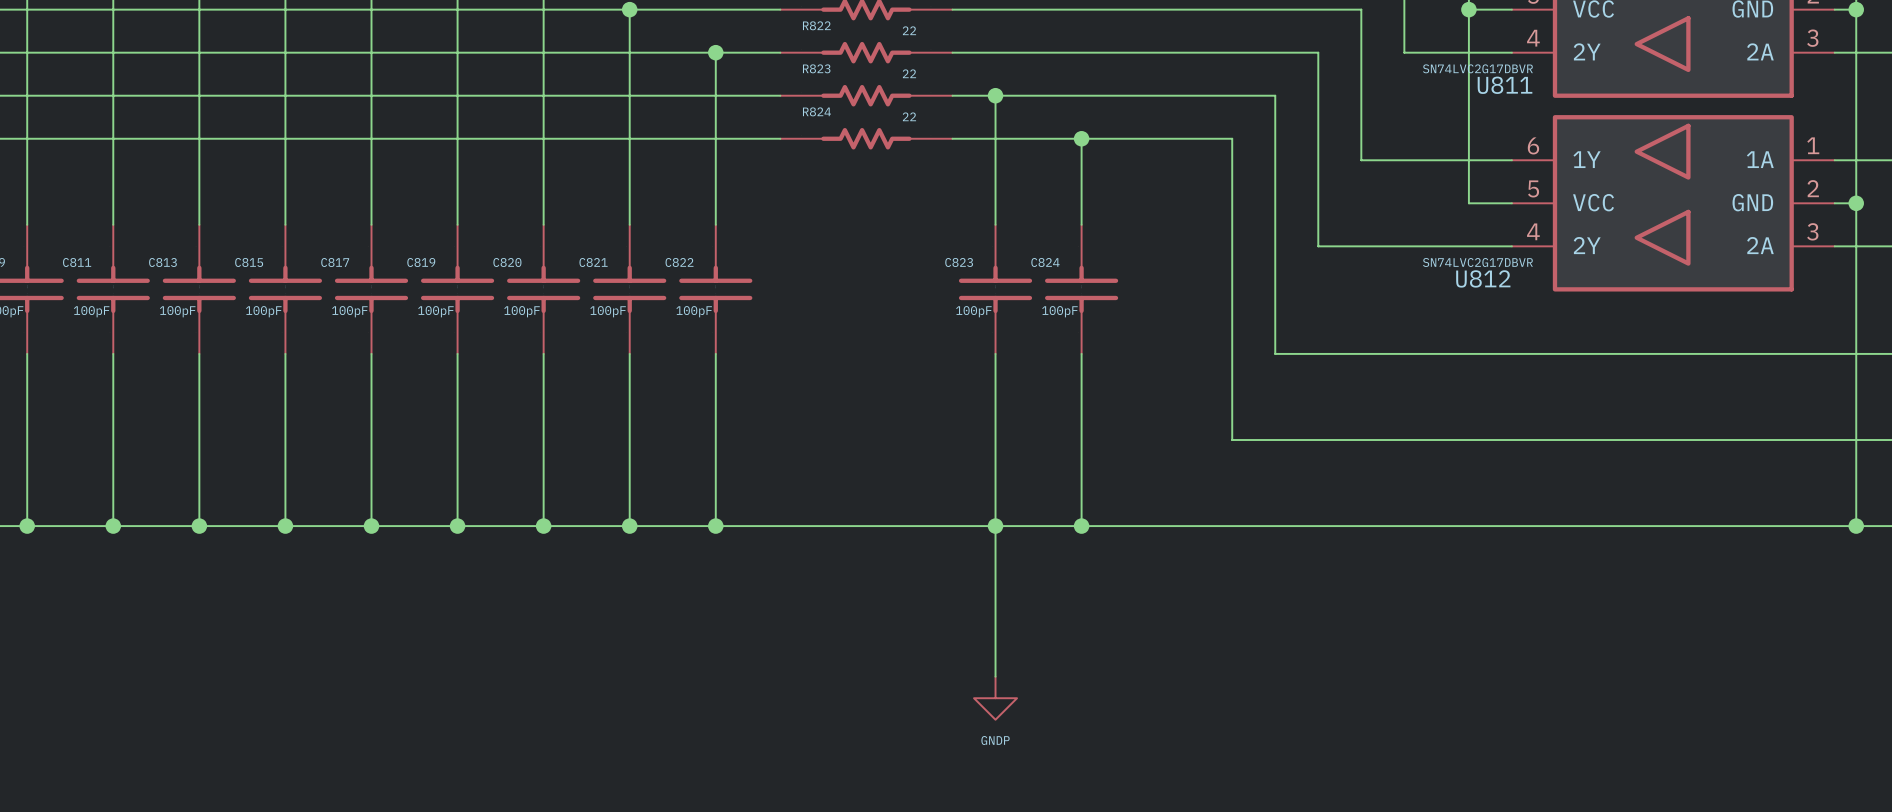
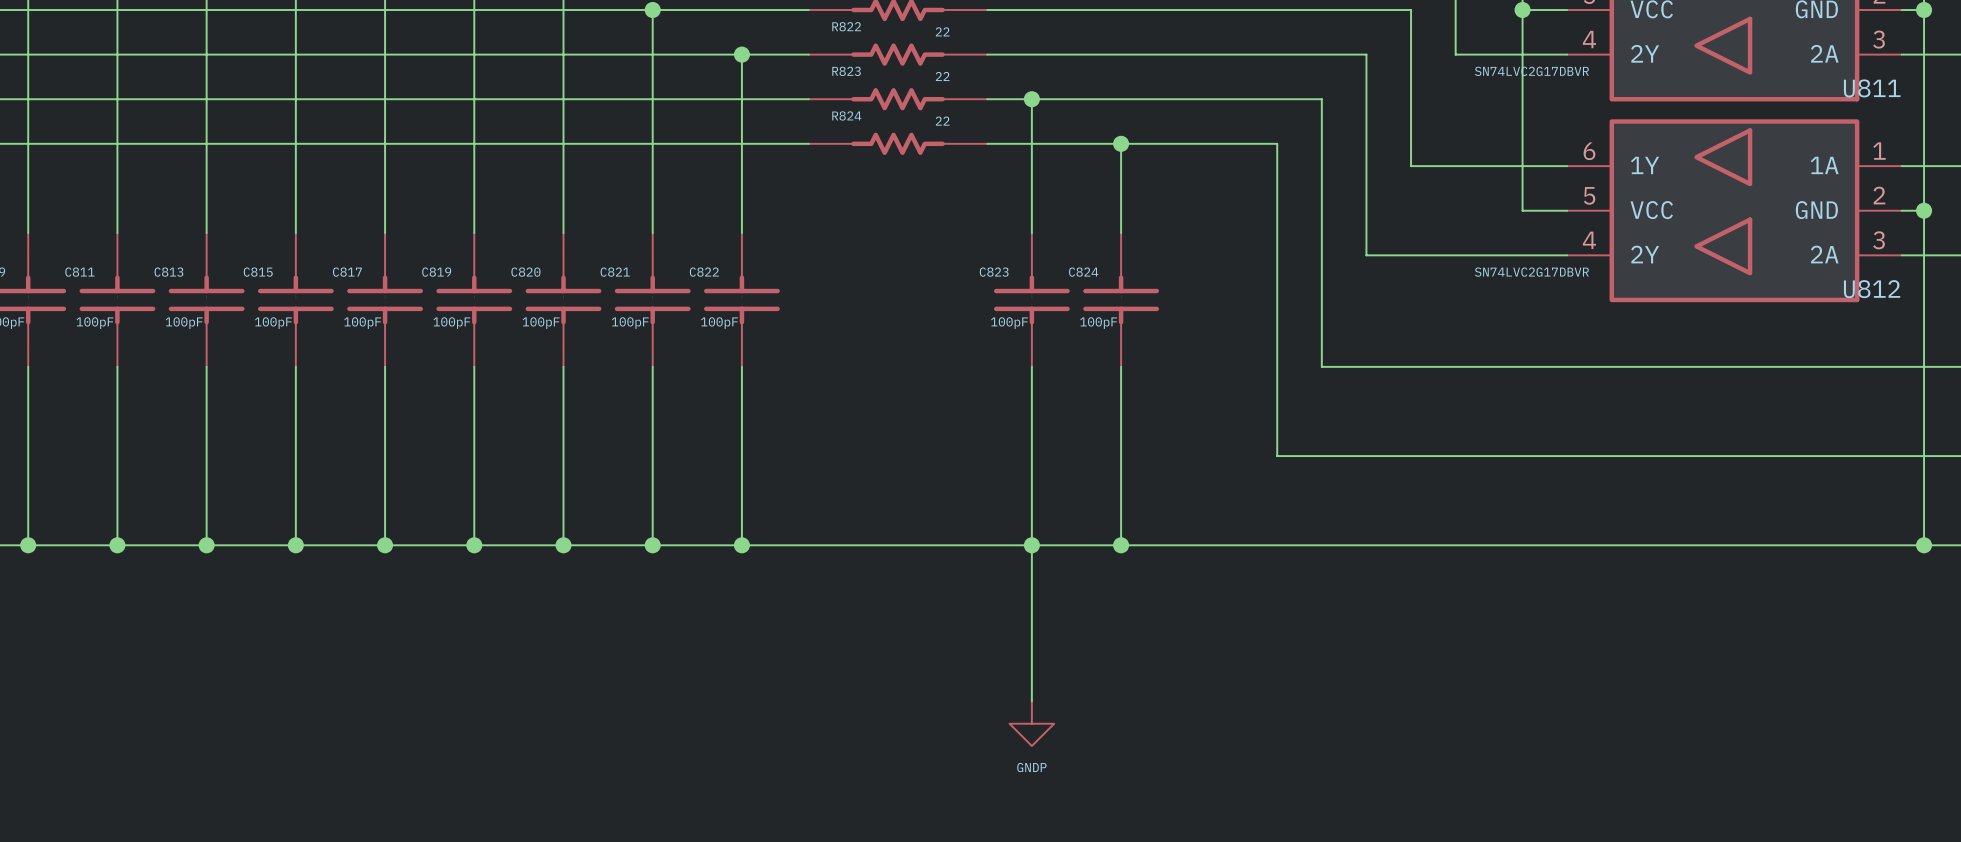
U811 name position: U811 (1505, 85) -> U811 (1872, 88)
U812 name position: U812 (1483, 278) -> U812 (1872, 289)

